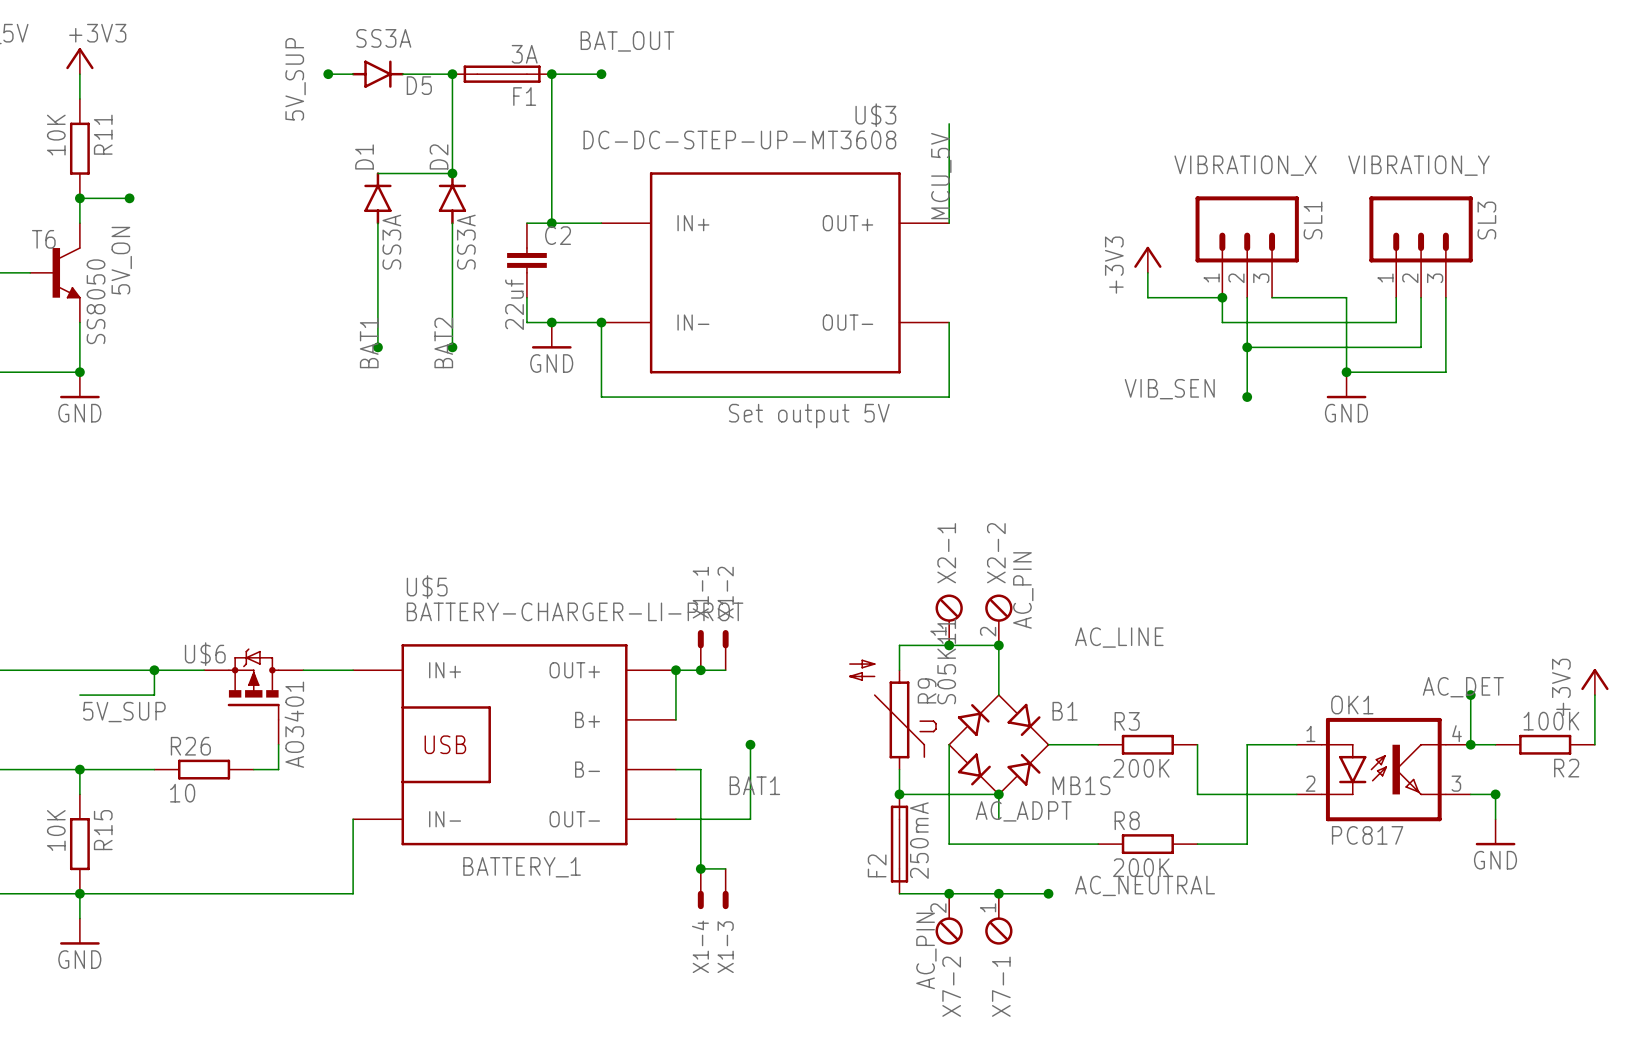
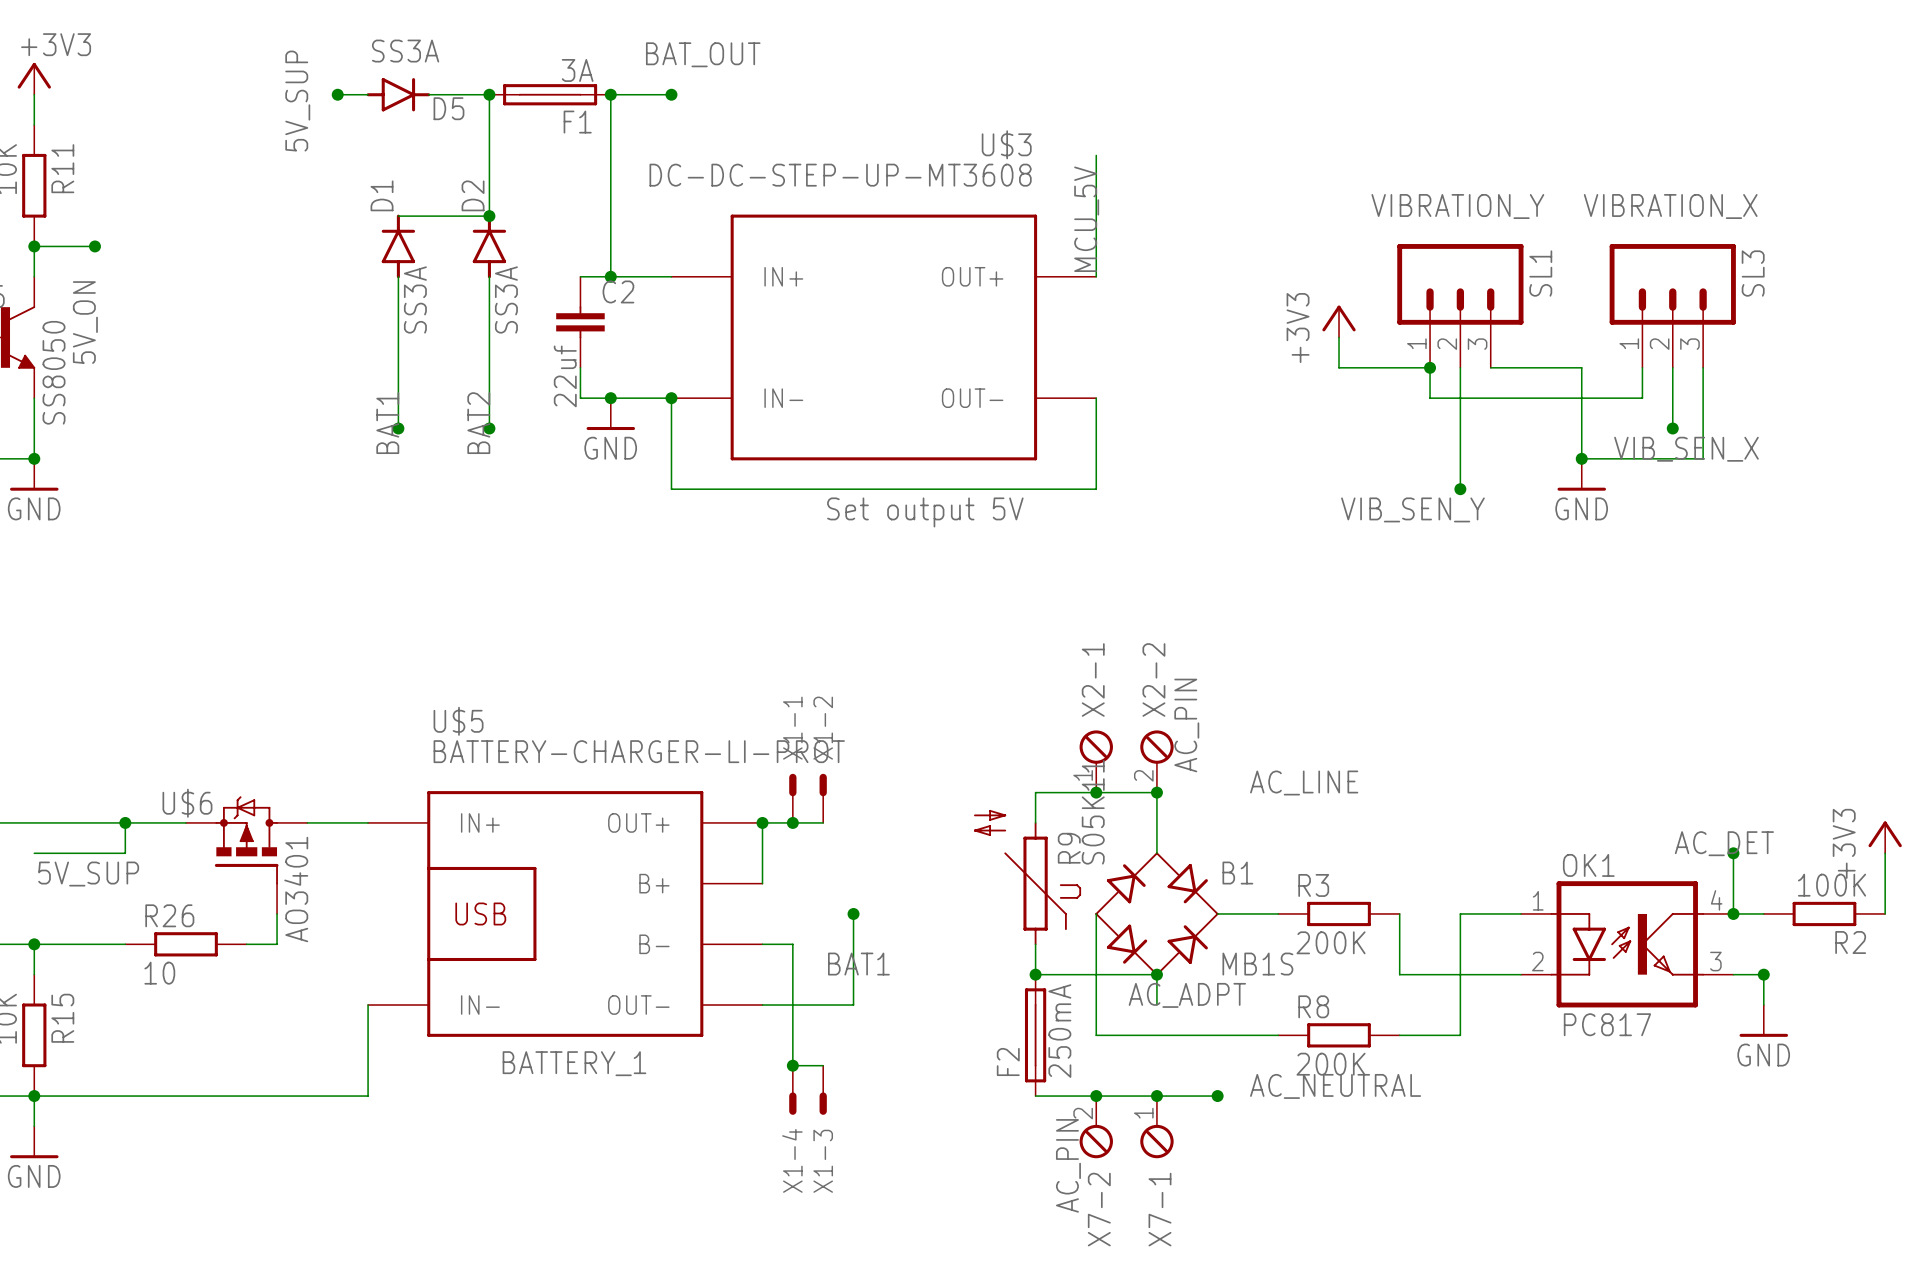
SL1 value: VIBRATION_X (1245, 165) -> VIBRATION_Y (1457, 206)
SL3 value: VIBRATION_Y (1418, 165) -> VIBRATION_X (1670, 206)
wire: (1247, 347) (1421, 347) -> none
junction: (1247, 347) -> none
junction: none -> (1672, 428)
label: none -> VIB_SEN_X (1686, 449)
label: VIB_SEN (1169, 389) -> VIB_SEN_Y (1412, 509)

